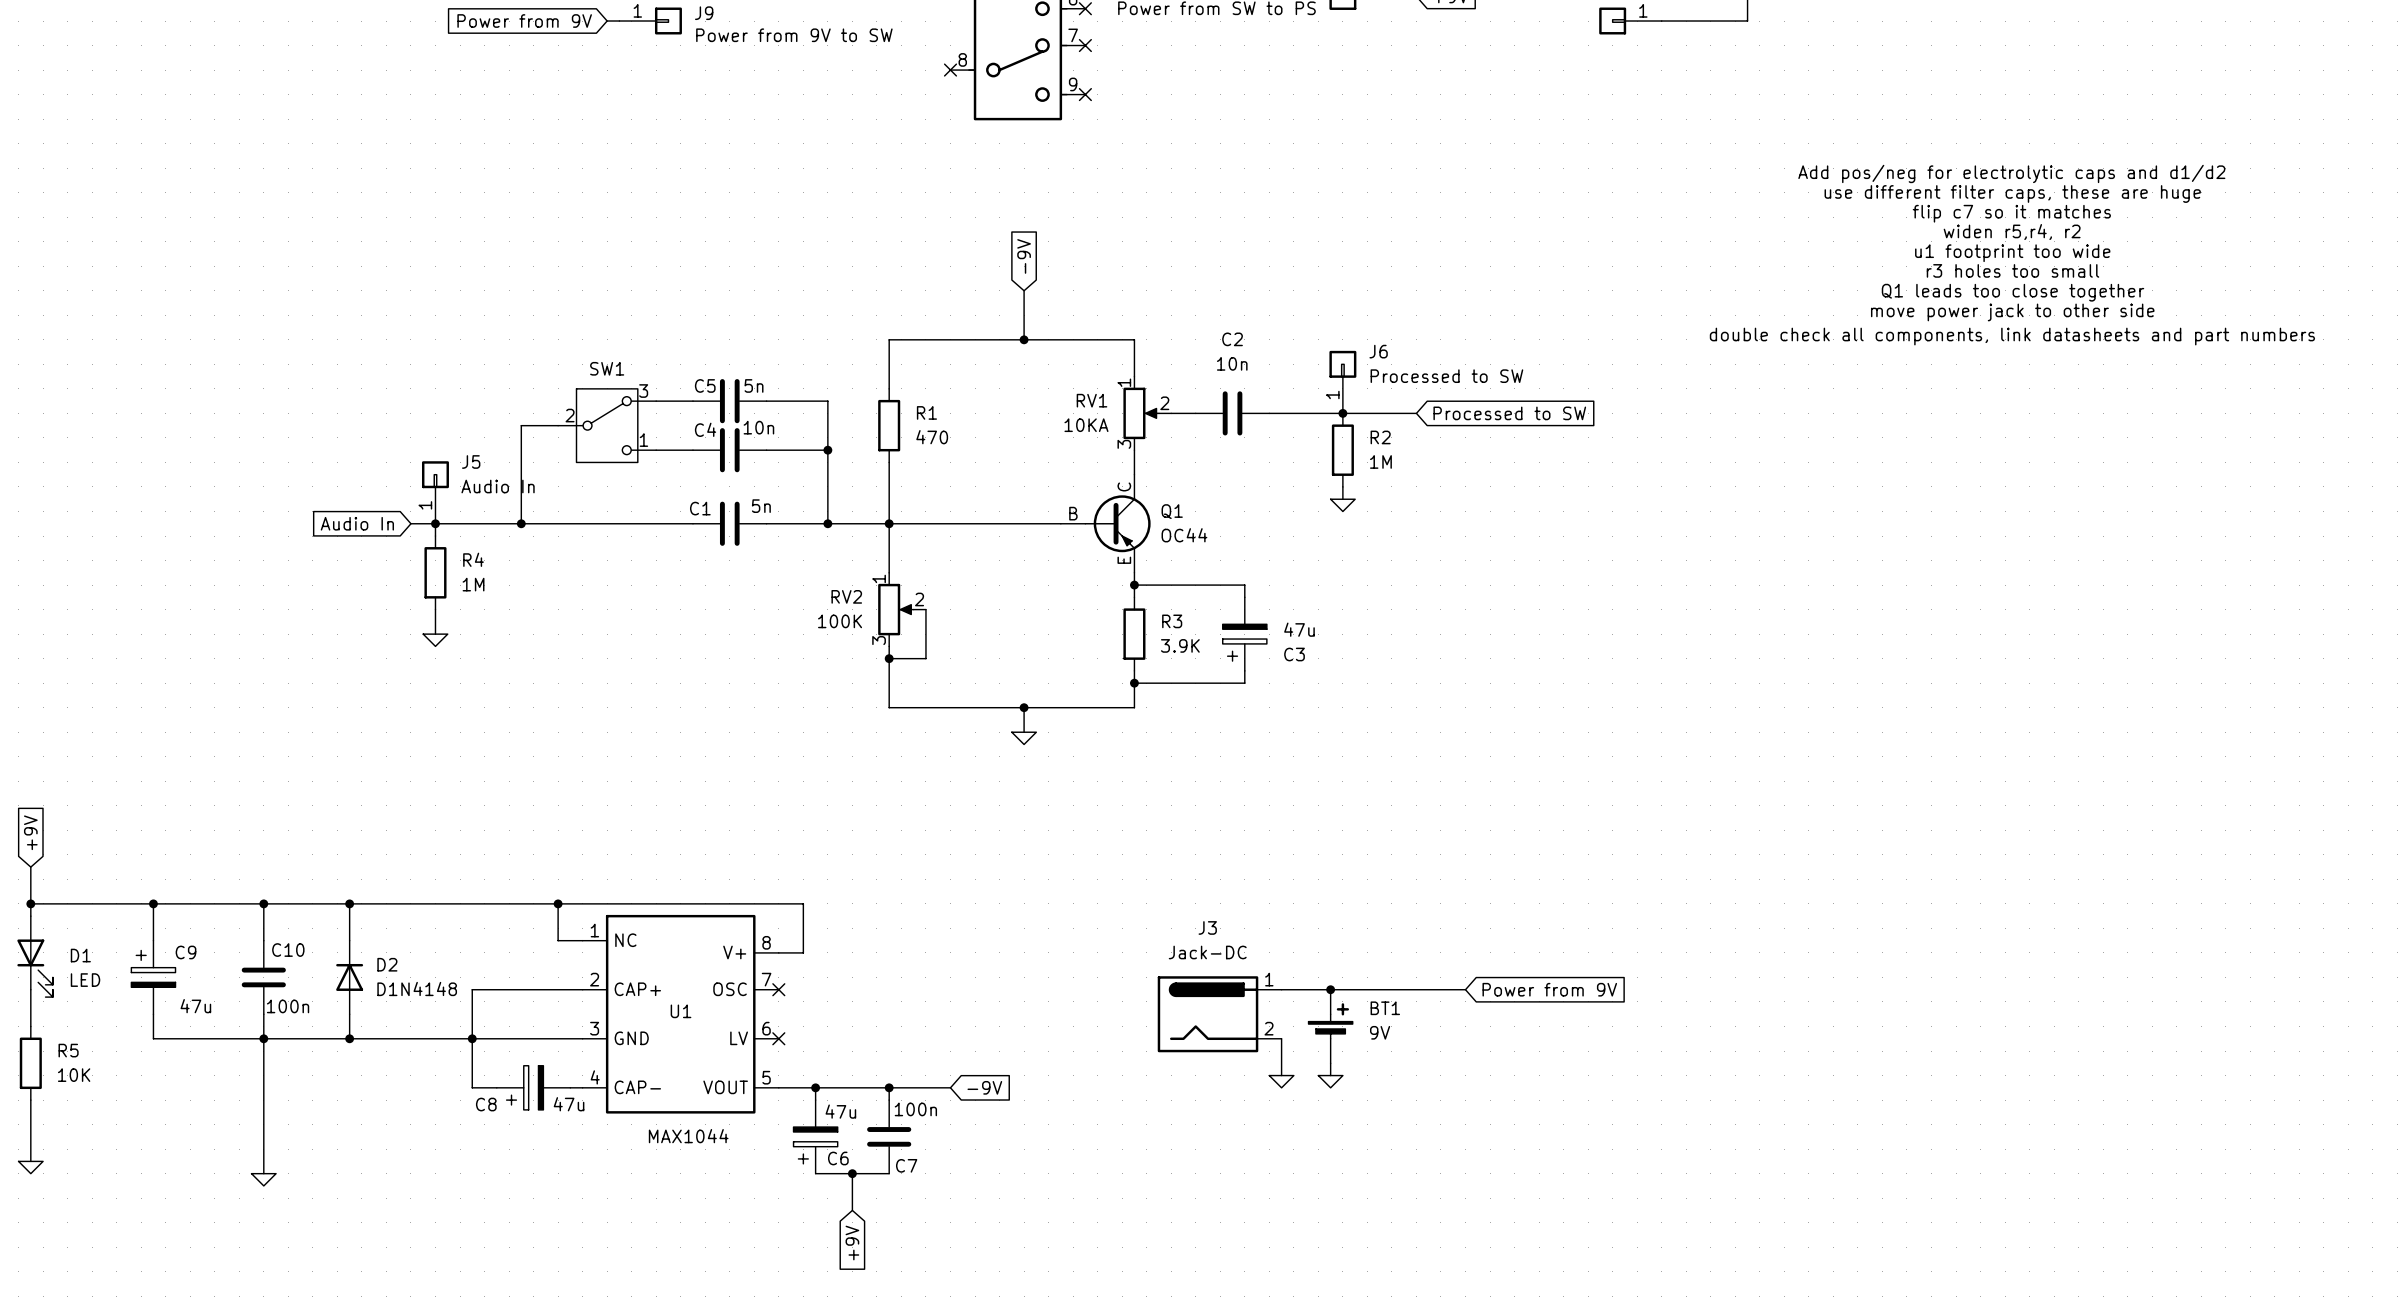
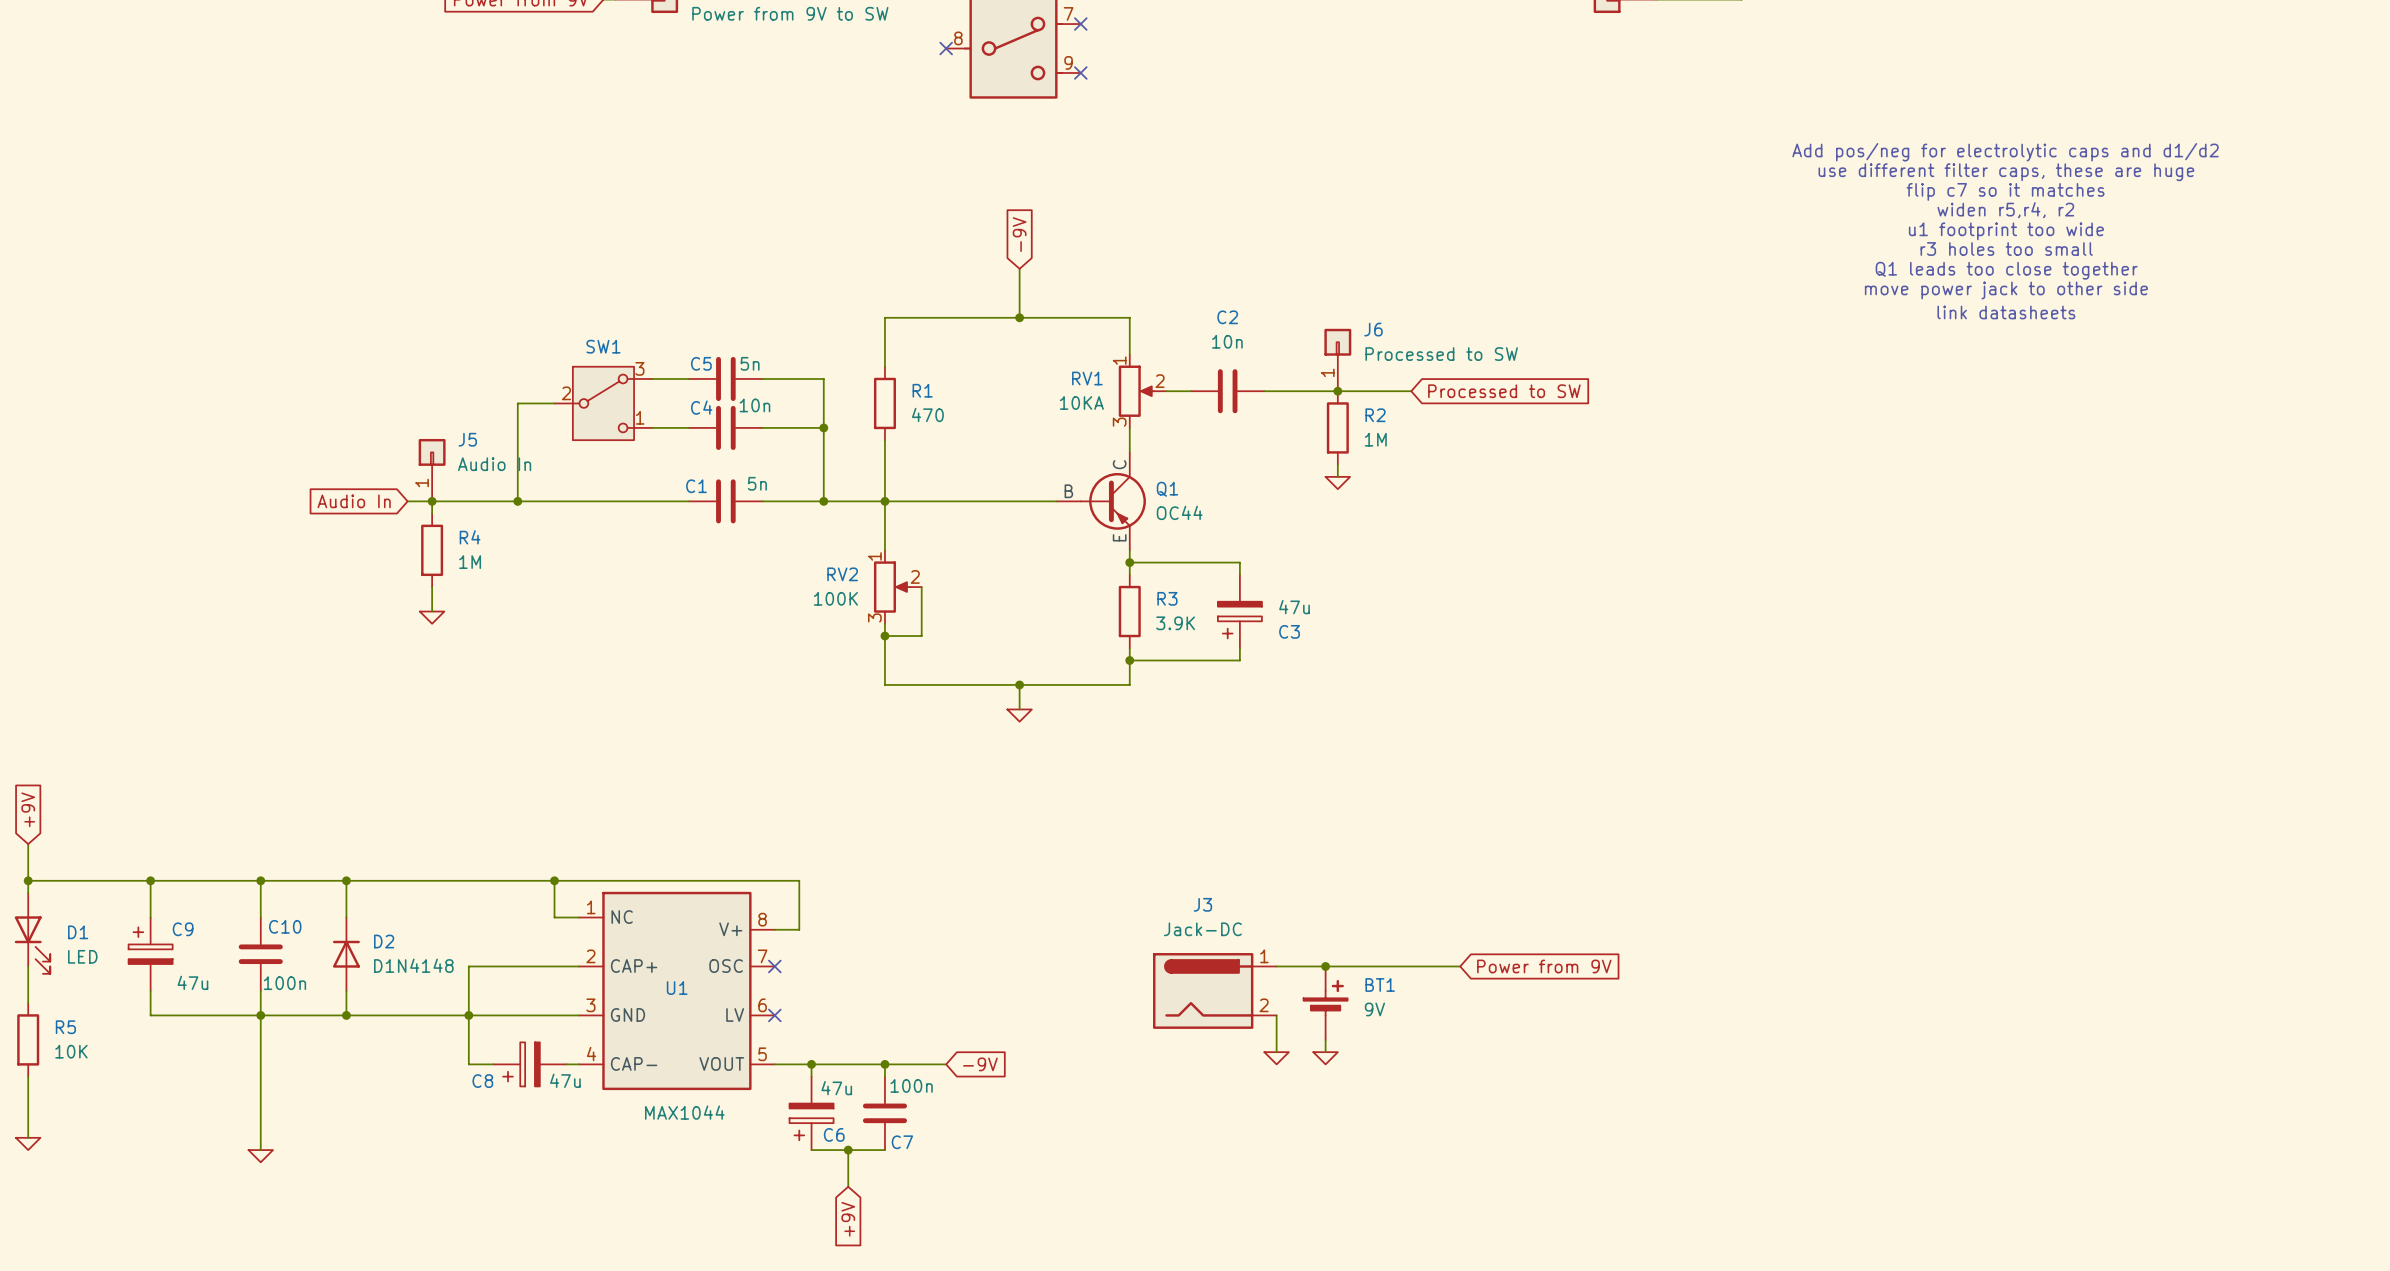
text: double check all components, link datasheets and part numbers (2012, 336) -> link datasheets (2006, 312)

